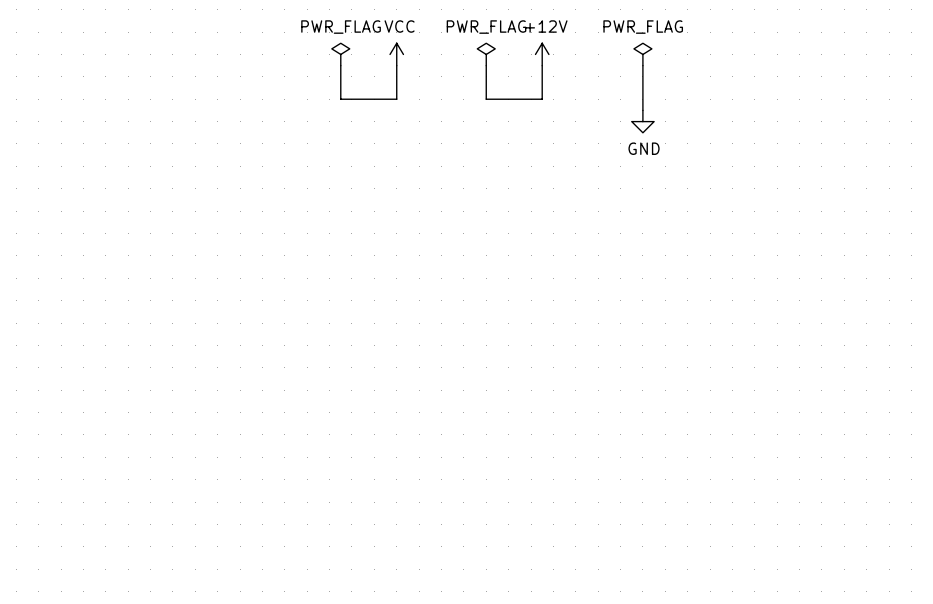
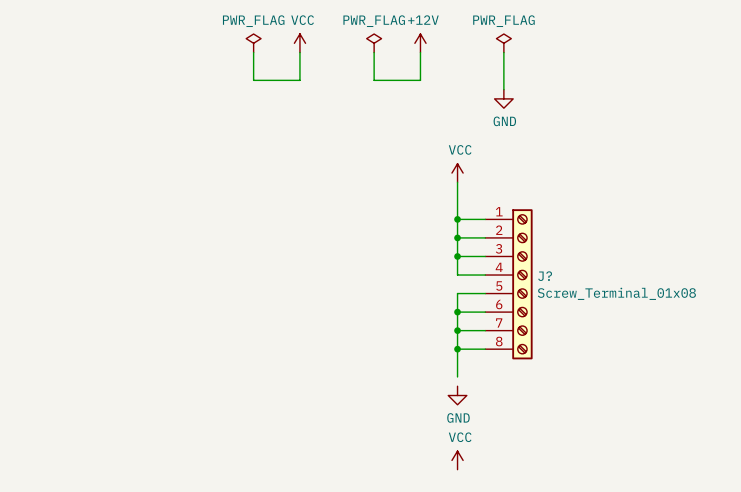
power symbol: none -> VCC (457, 173)
wire: none -> (457, 182) (457, 275) (485, 275)
wire: none -> (457, 219) (485, 219)
junction: none -> (457, 219)
wire: none -> (457, 237) (485, 237)
junction: none -> (457, 237)
wire: none -> (457, 256) (485, 256)
junction: none -> (457, 256)
J?: none -> Screw_Terminal_01x08 (508, 284)
wire: none -> (485, 293) (457, 293) (457, 376)
wire: none -> (457, 312) (485, 312)
junction: none -> (457, 312)
wire: none -> (457, 330) (485, 330)
junction: none -> (457, 330)
wire: none -> (457, 349) (485, 349)
junction: none -> (457, 349)
power symbol: none -> GND (457, 395)
power symbol: none -> VCC (457, 460)

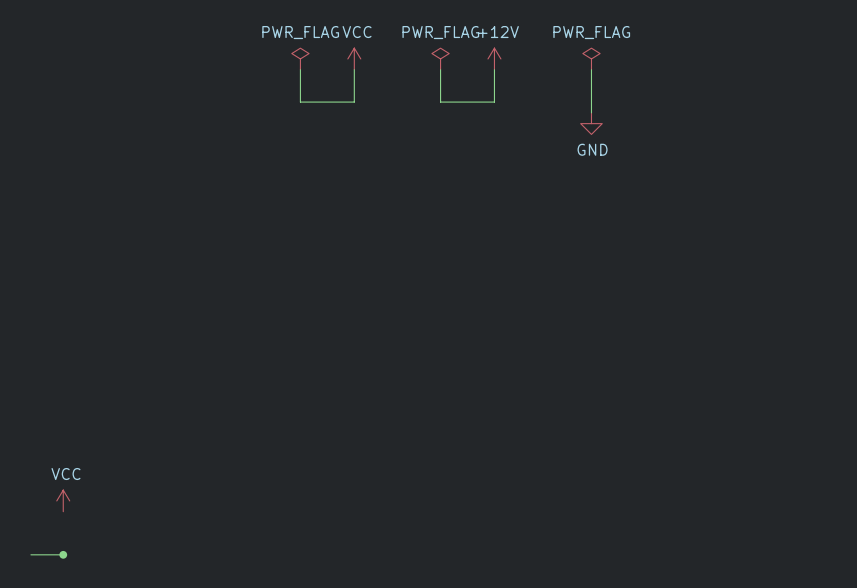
power symbol: VCC (457, 173) -> none
wire: (457, 182) (457, 275) (485, 275) -> none
wire: (457, 219) (485, 219) -> none
junction: (457, 219) -> none
wire: (457, 237) (485, 237) -> none
junction: (457, 237) -> none
wire: (457, 256) (485, 256) -> none
junction: (457, 256) -> none
J?: Screw_Terminal_01x08 (508, 284) -> none
wire: (485, 293) (457, 293) (457, 376) -> none
wire: (457, 312) (485, 312) -> none
junction: (457, 312) -> none
wire: (457, 330) (485, 330) -> none
junction: (457, 330) -> none
wire: (457, 349) (485, 349) -> none
junction: (457, 349) -> none
power symbol: GND (457, 395) -> none
power symbol: none -> VCC (63, 500)
power symbol: VCC (457, 460) -> none
wire: none -> (30, 554) (63, 554)
junction: none -> (63, 554)

